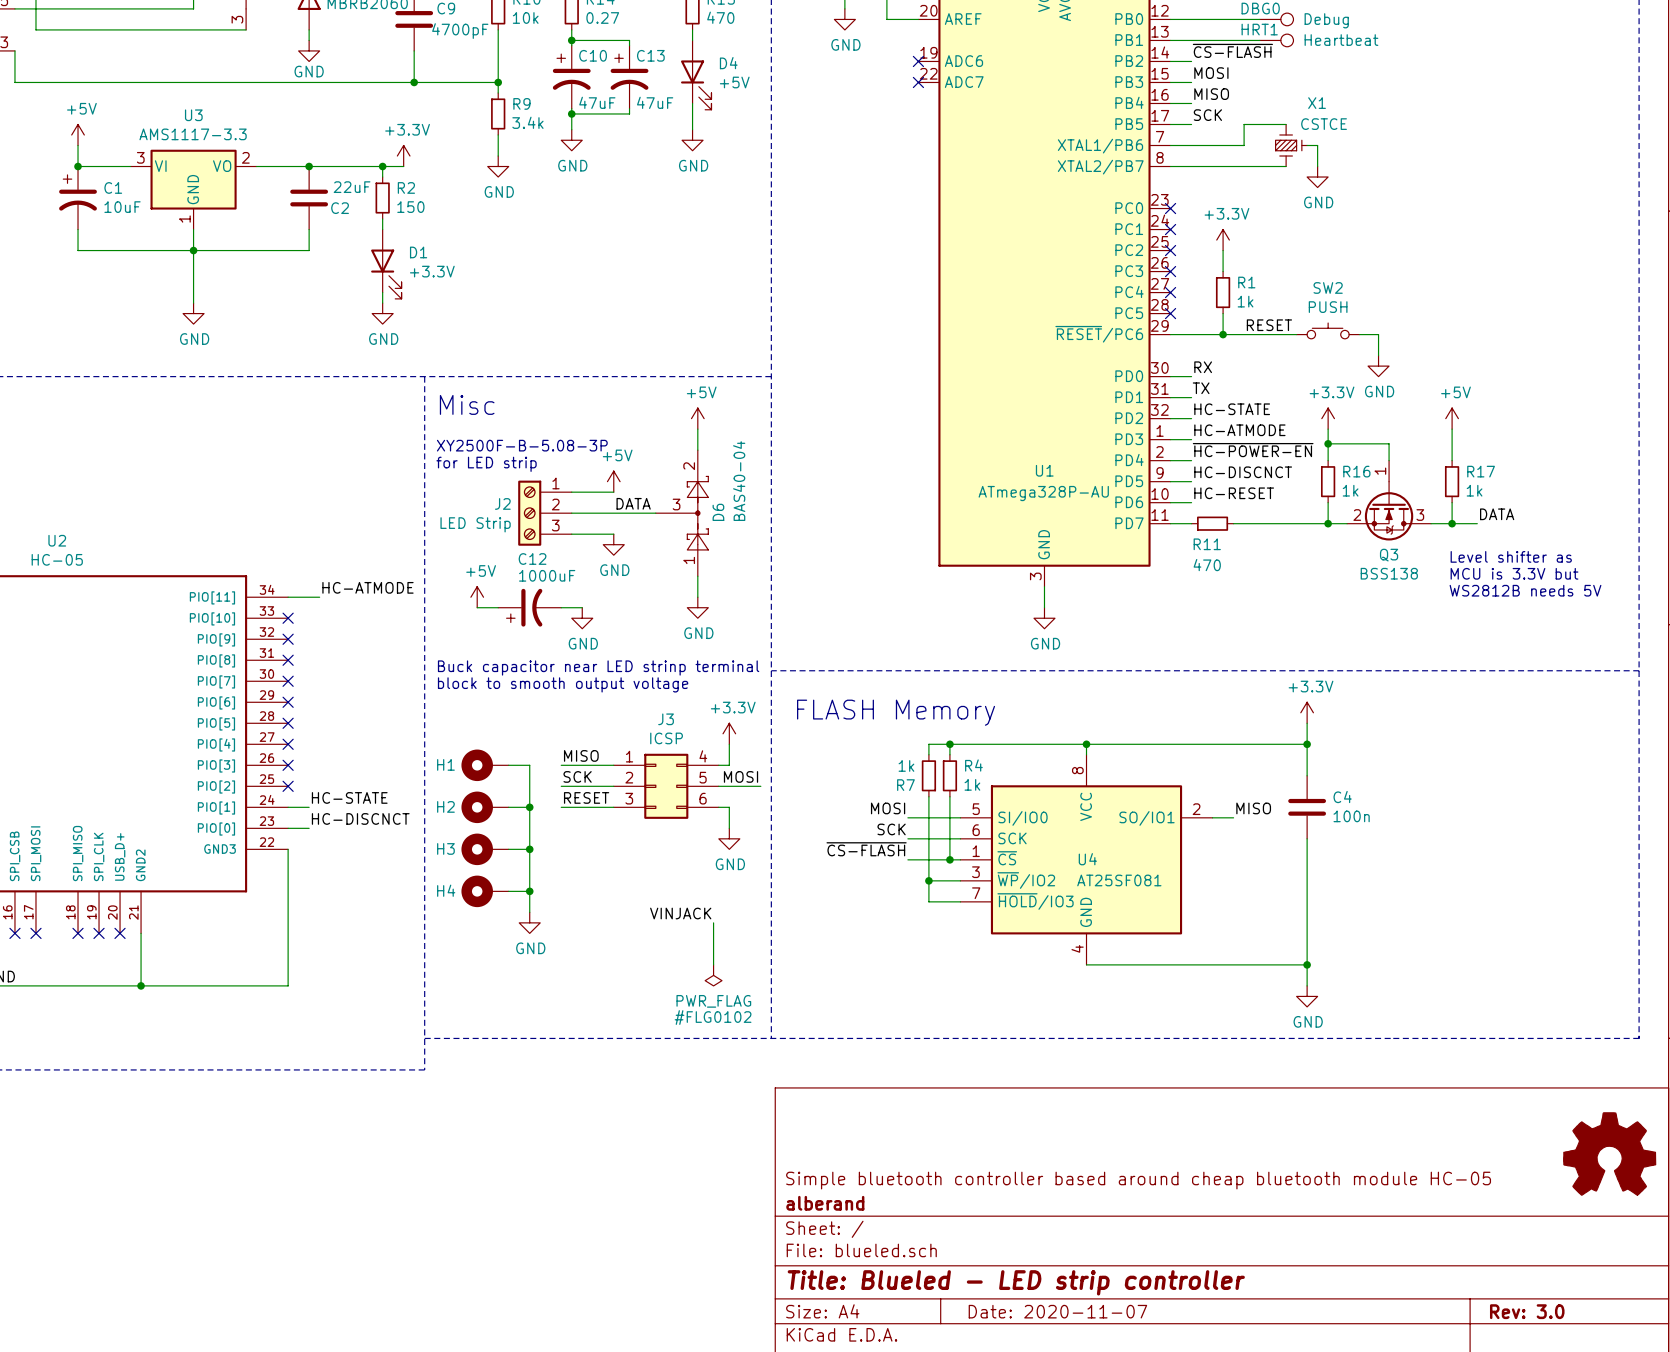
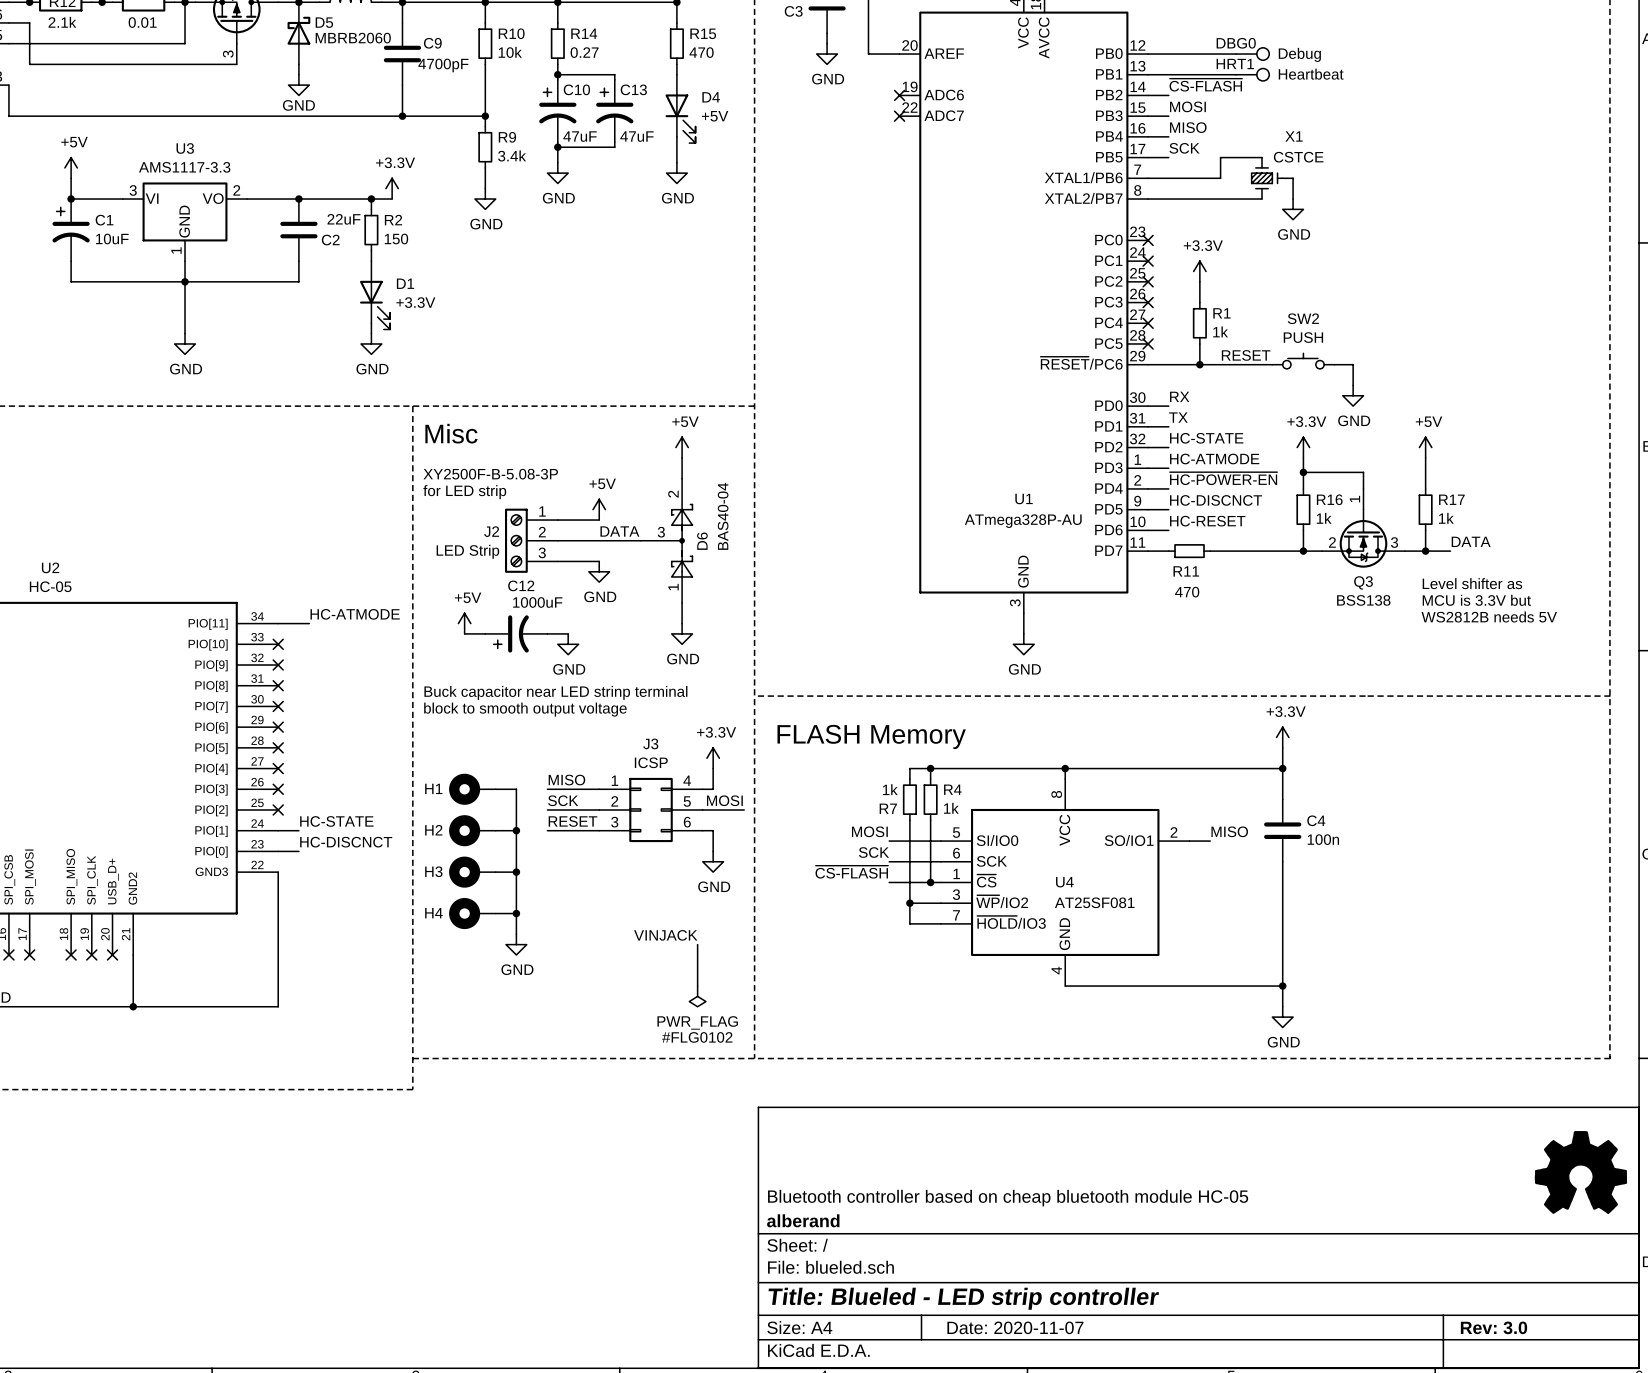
title block: Simple bluetooth controller based around cheap bluetooth module HC-05 (1138, 1180) -> Bluetooth controller based on cheap bluetooth module HC-05 (1008, 1198)

